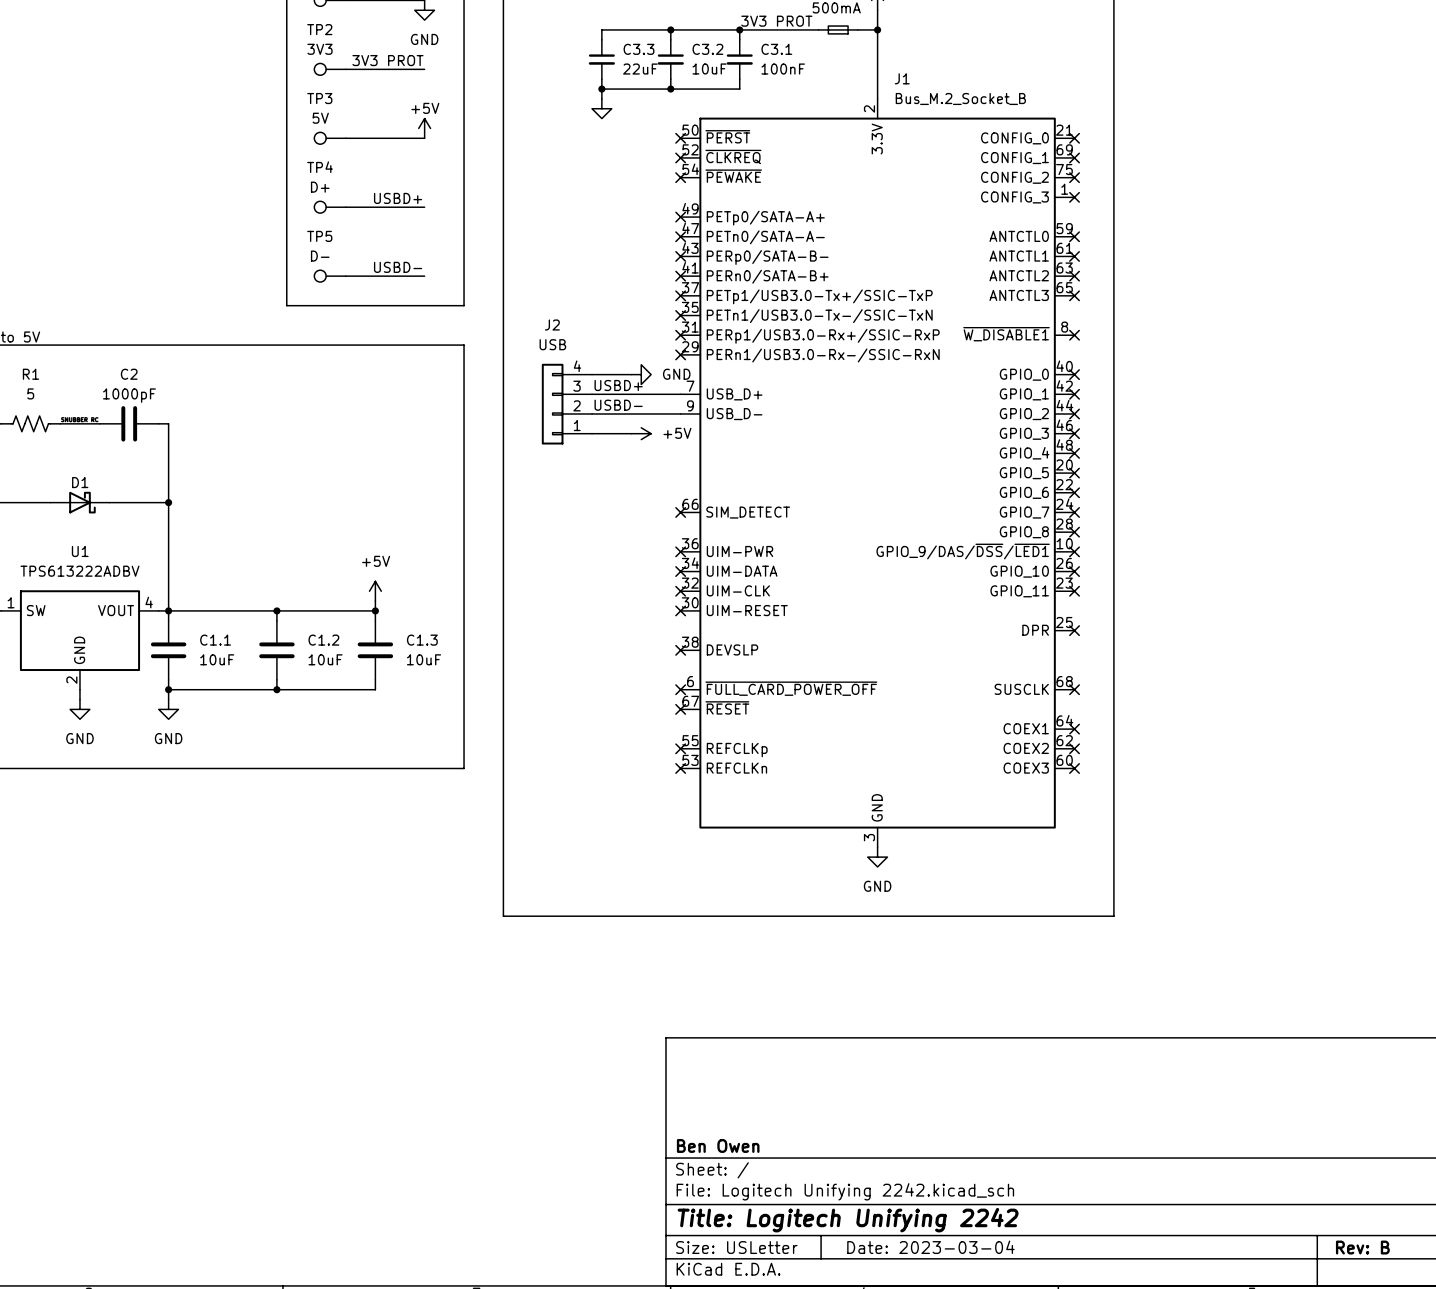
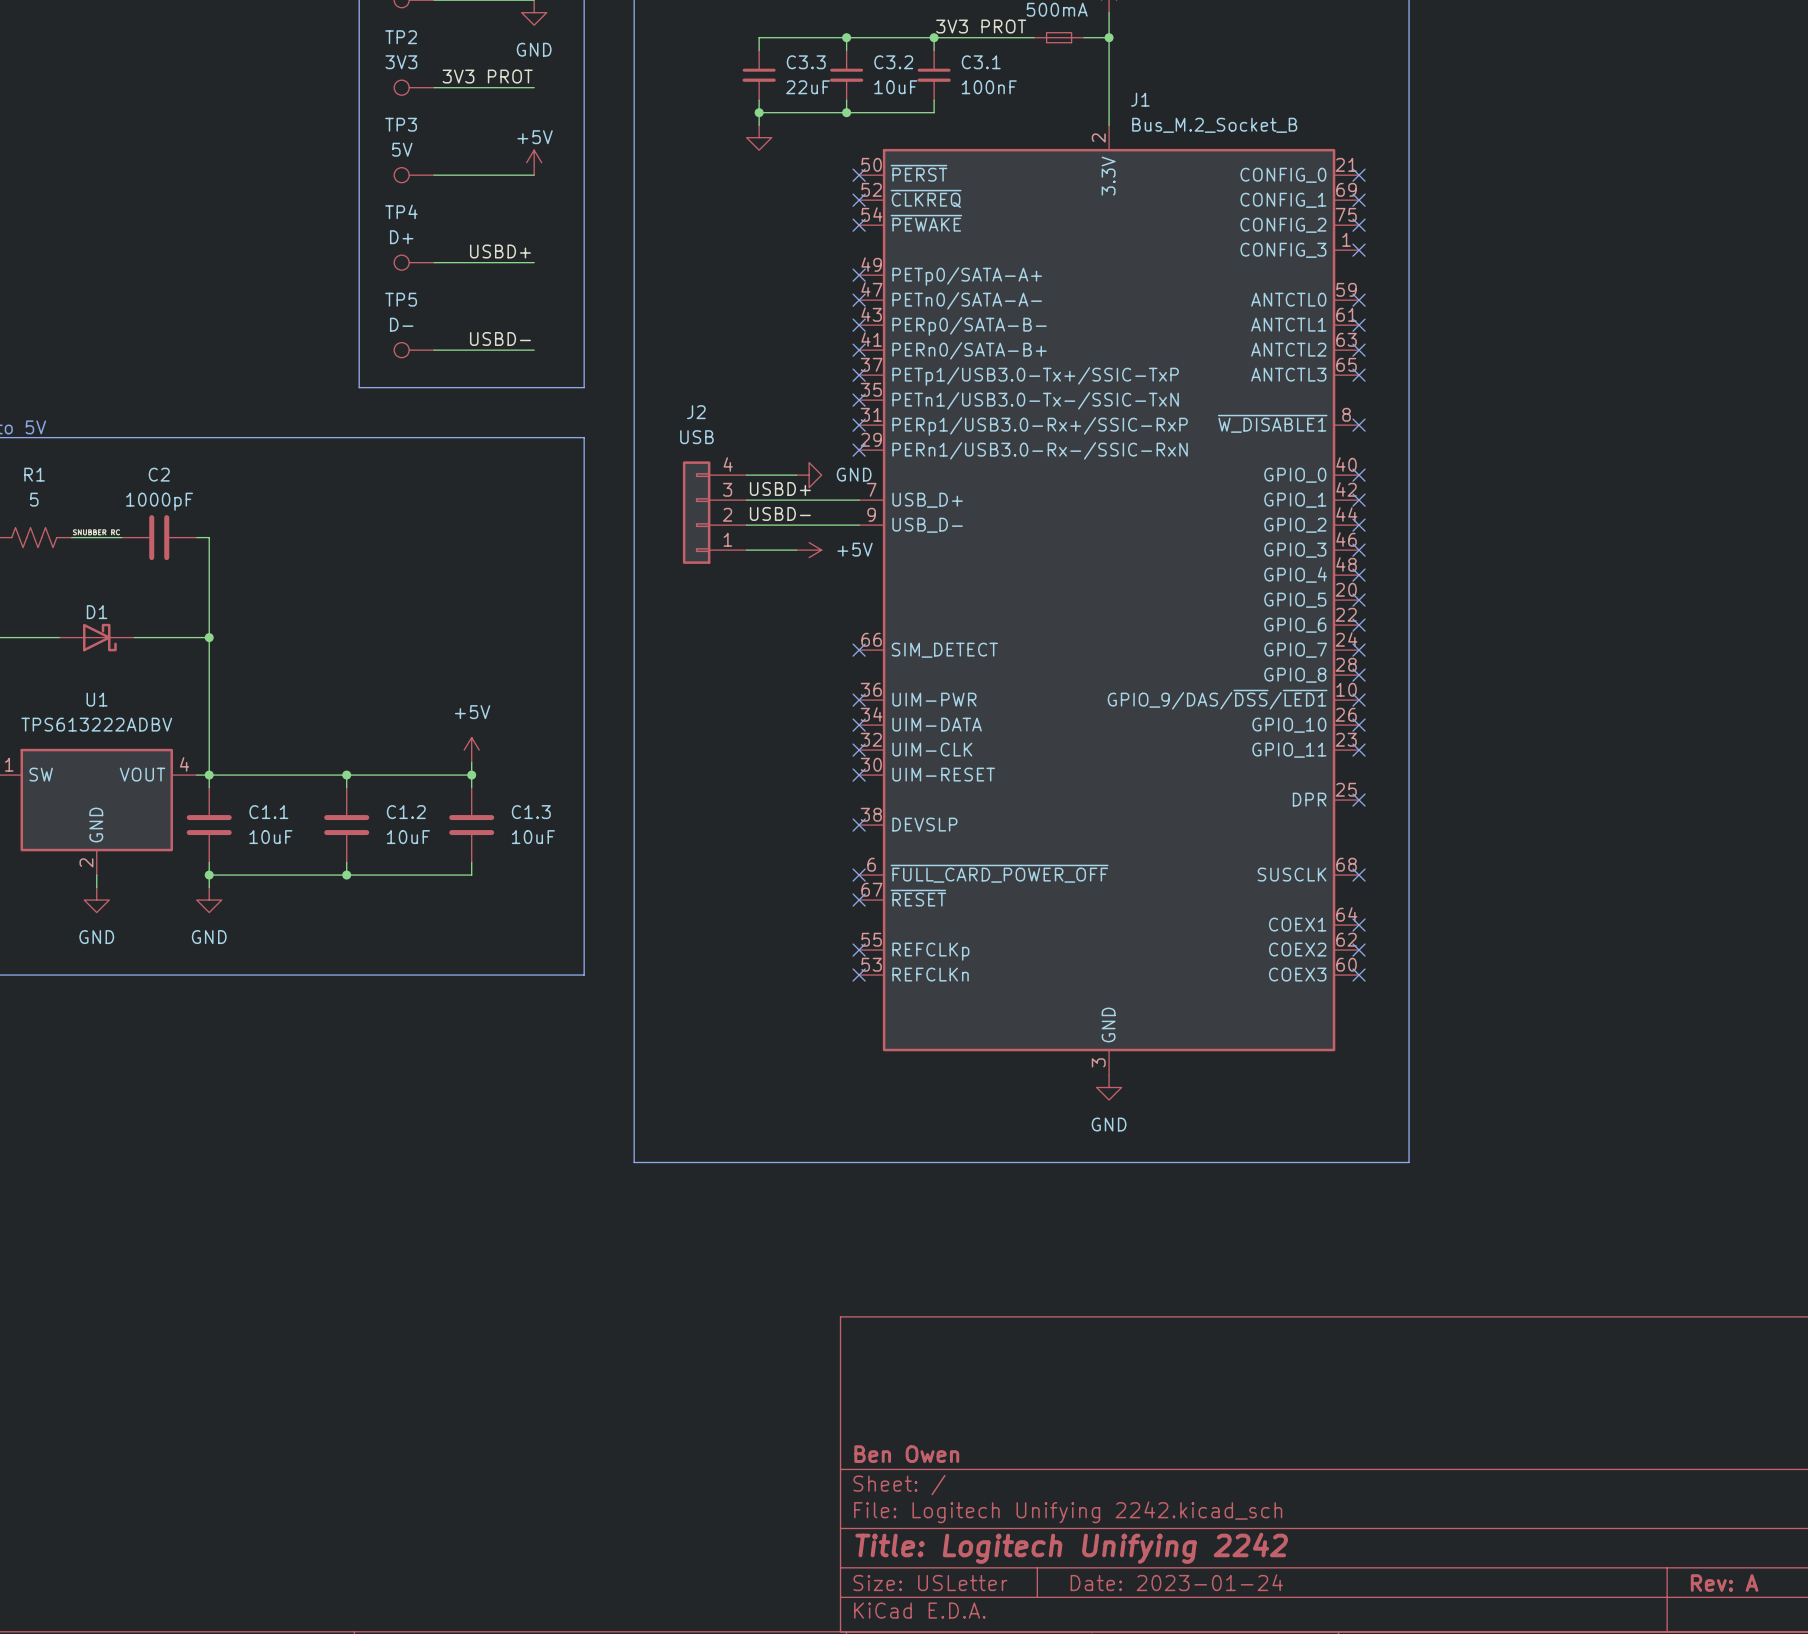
title block: Date: 2023-03-04 (930, 1247) -> Date: 2023-01-24 (1176, 1582)
title block: Rev: B (1362, 1247) -> Rev: A (1724, 1583)

